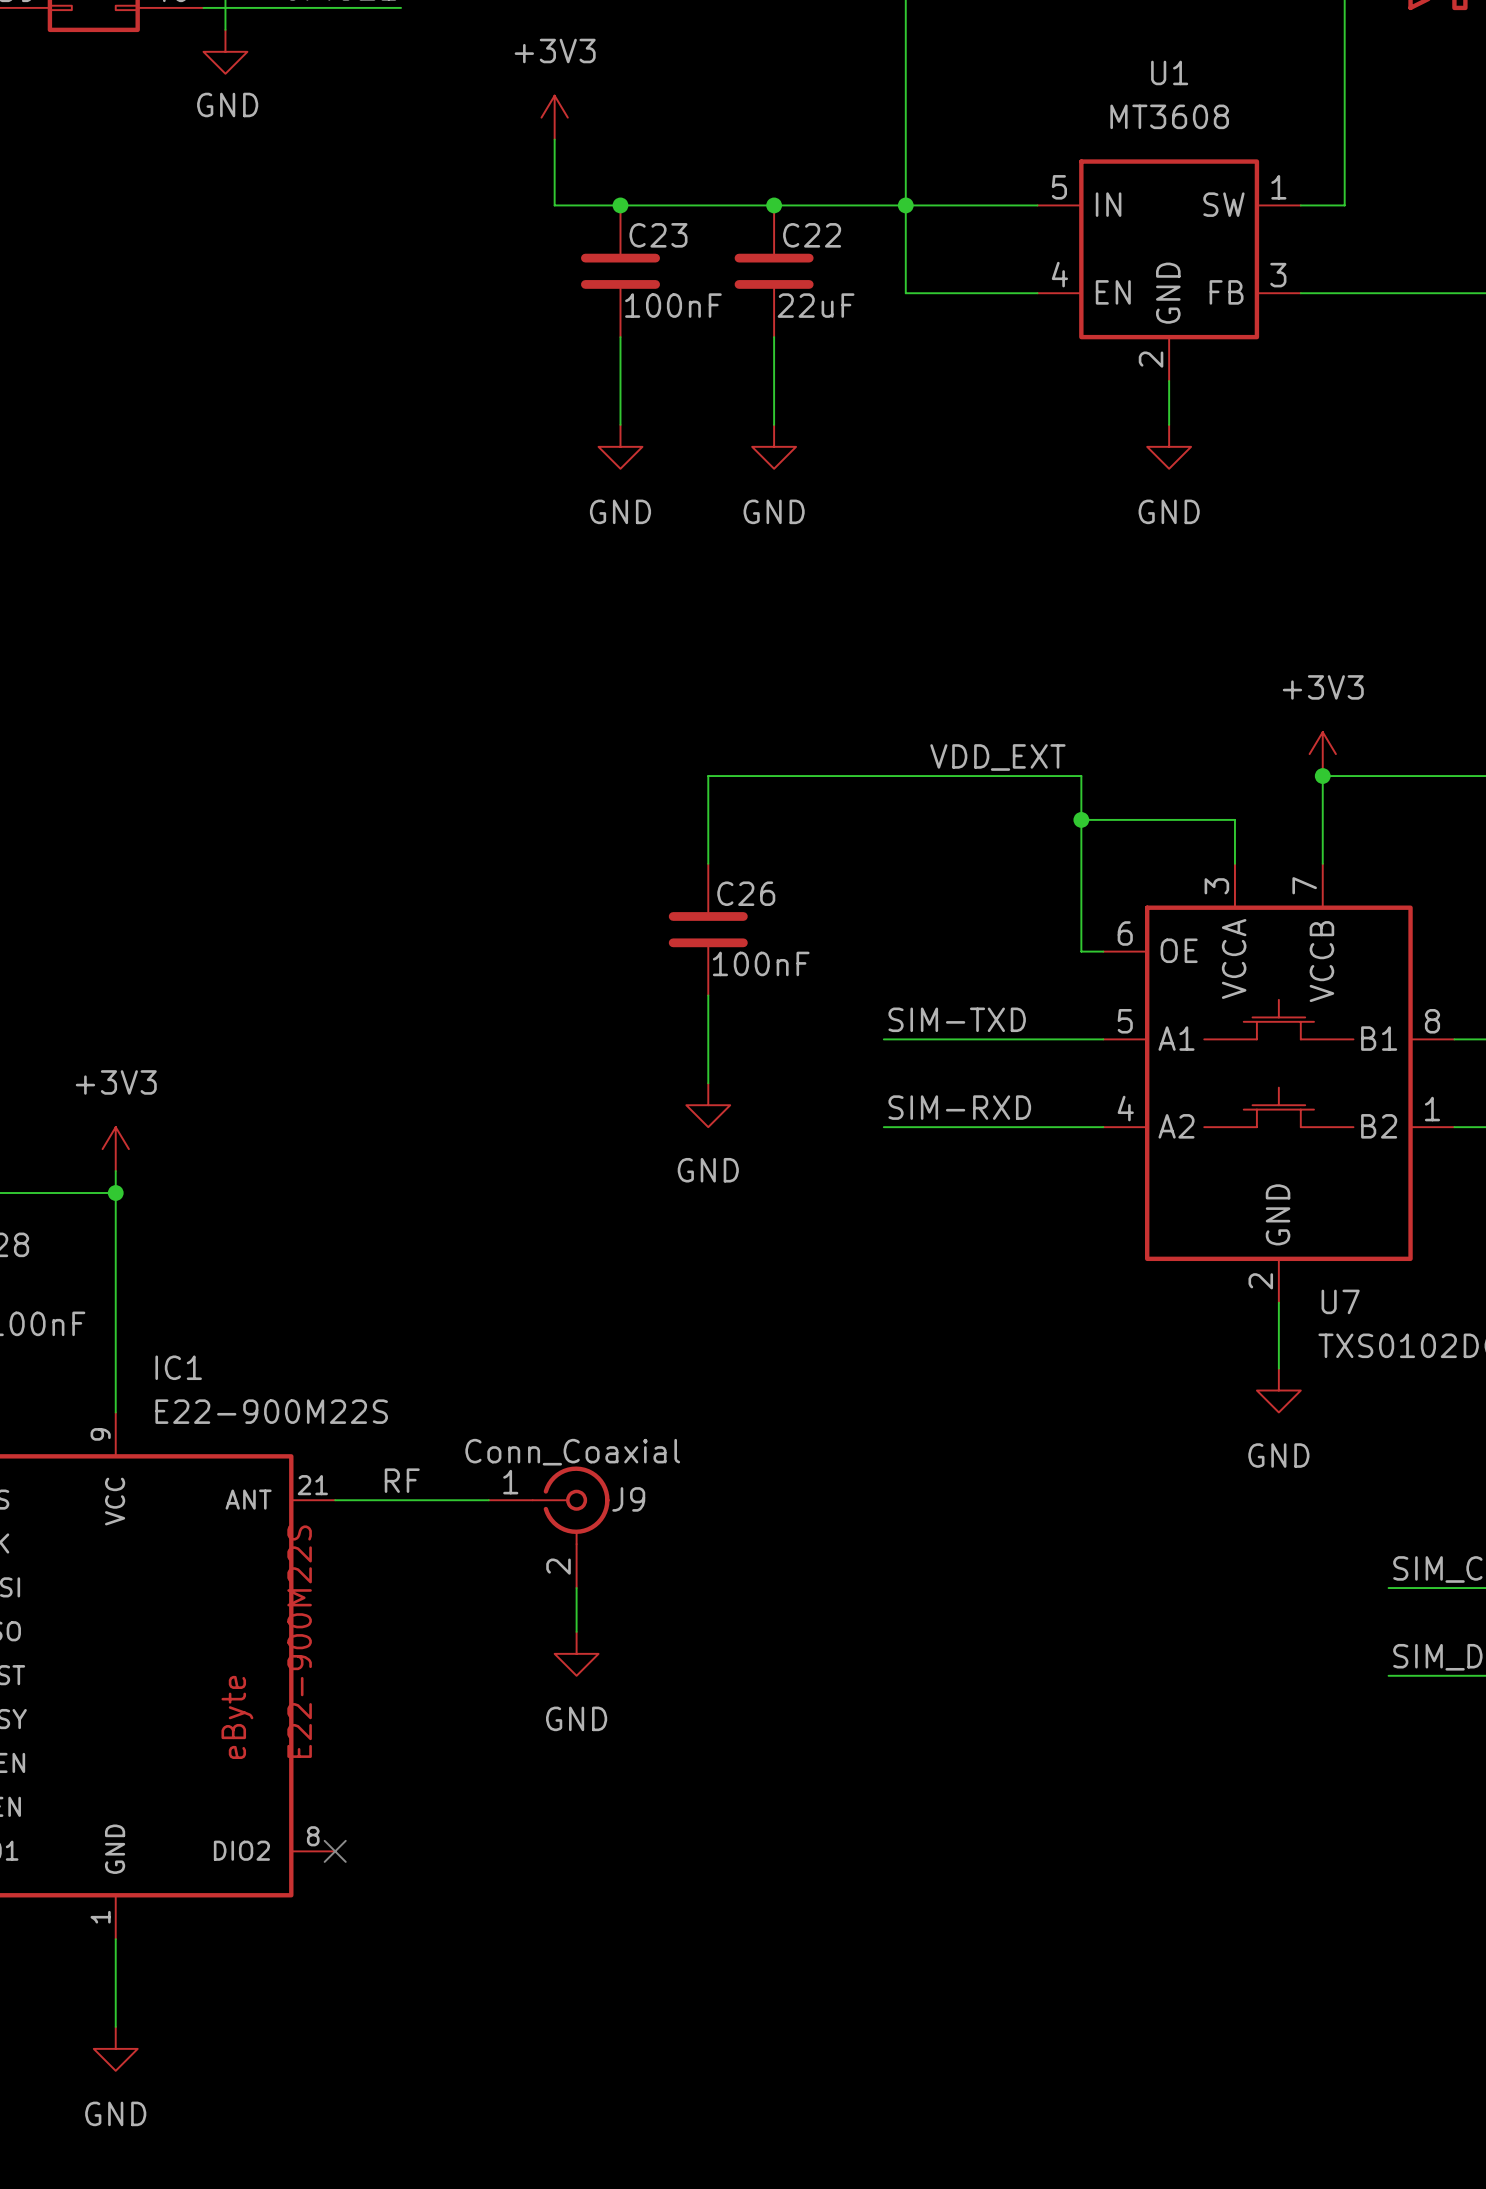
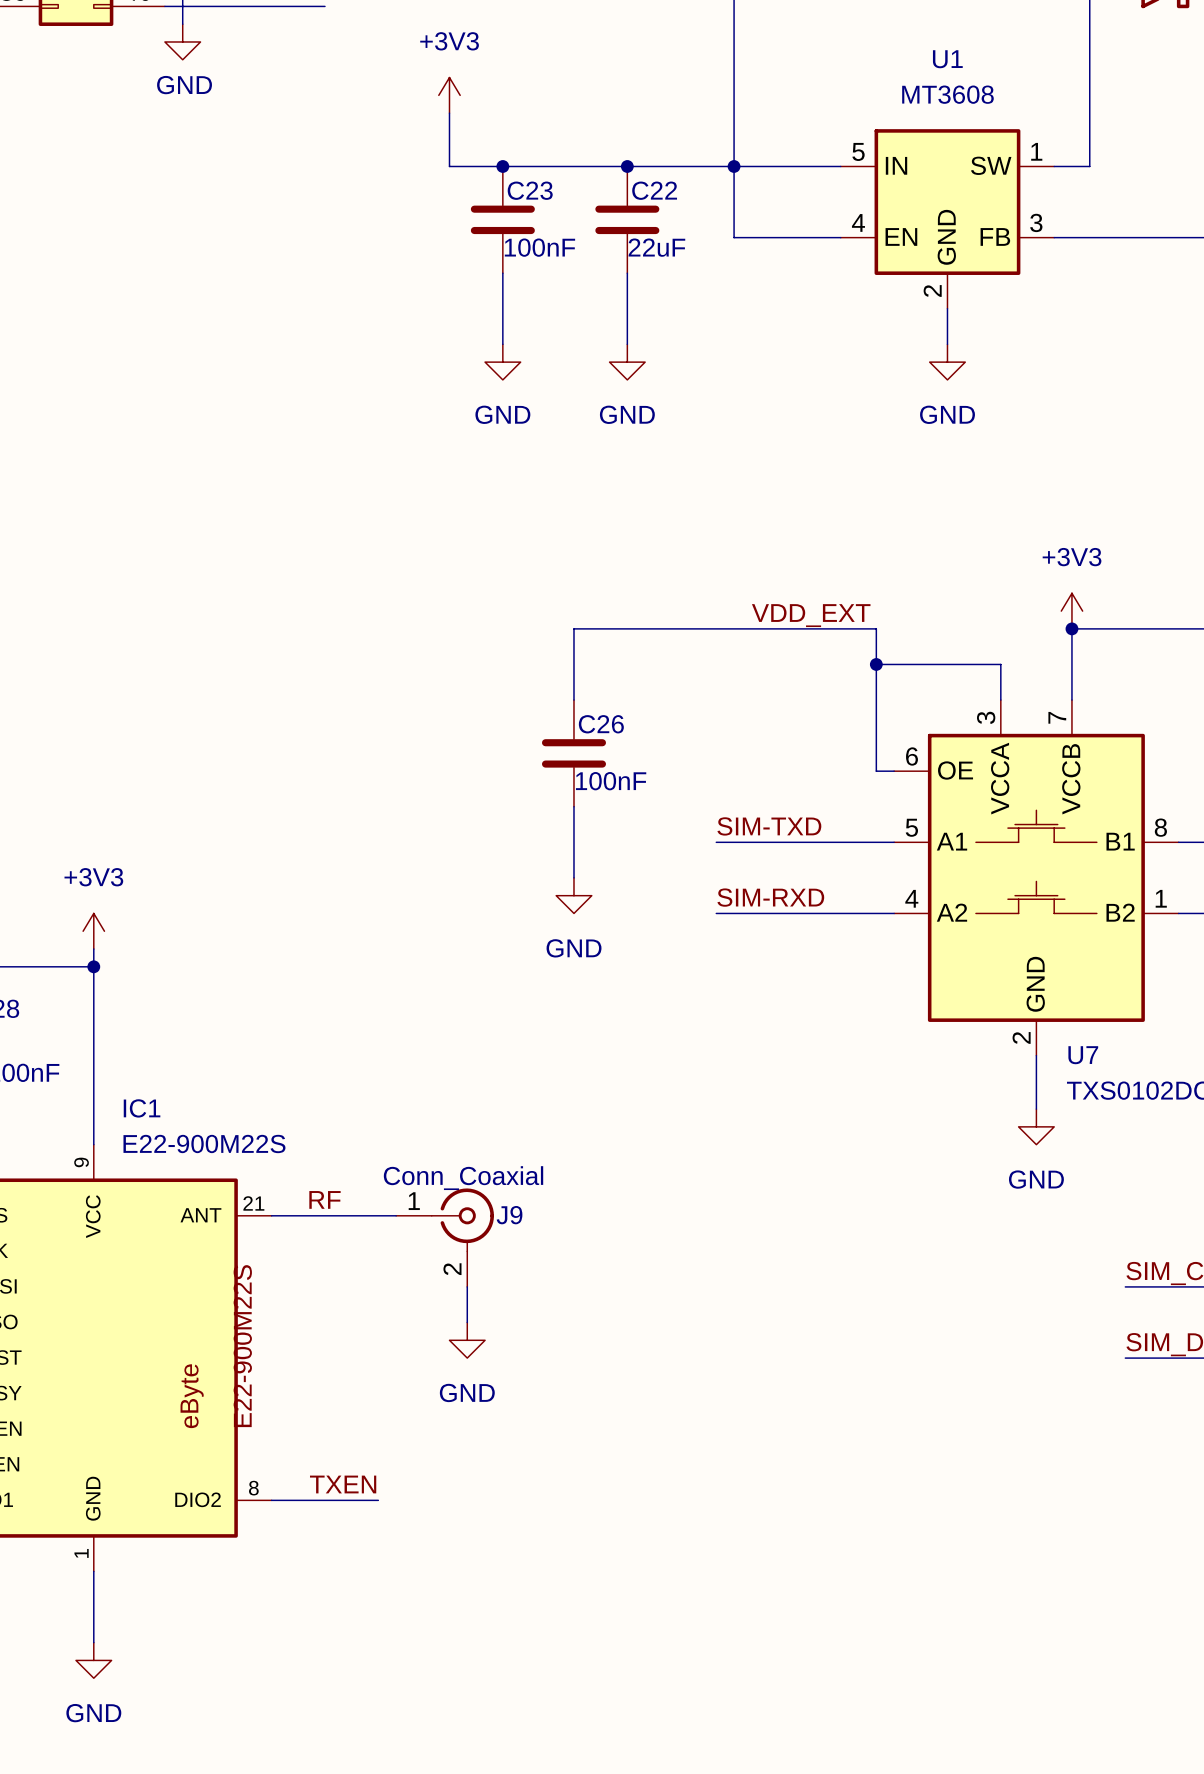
label: none -> TXEN (343, 1484)
wire: none -> (271, 1500) (378, 1500)
no-connect mark: (335, 1851) -> none

